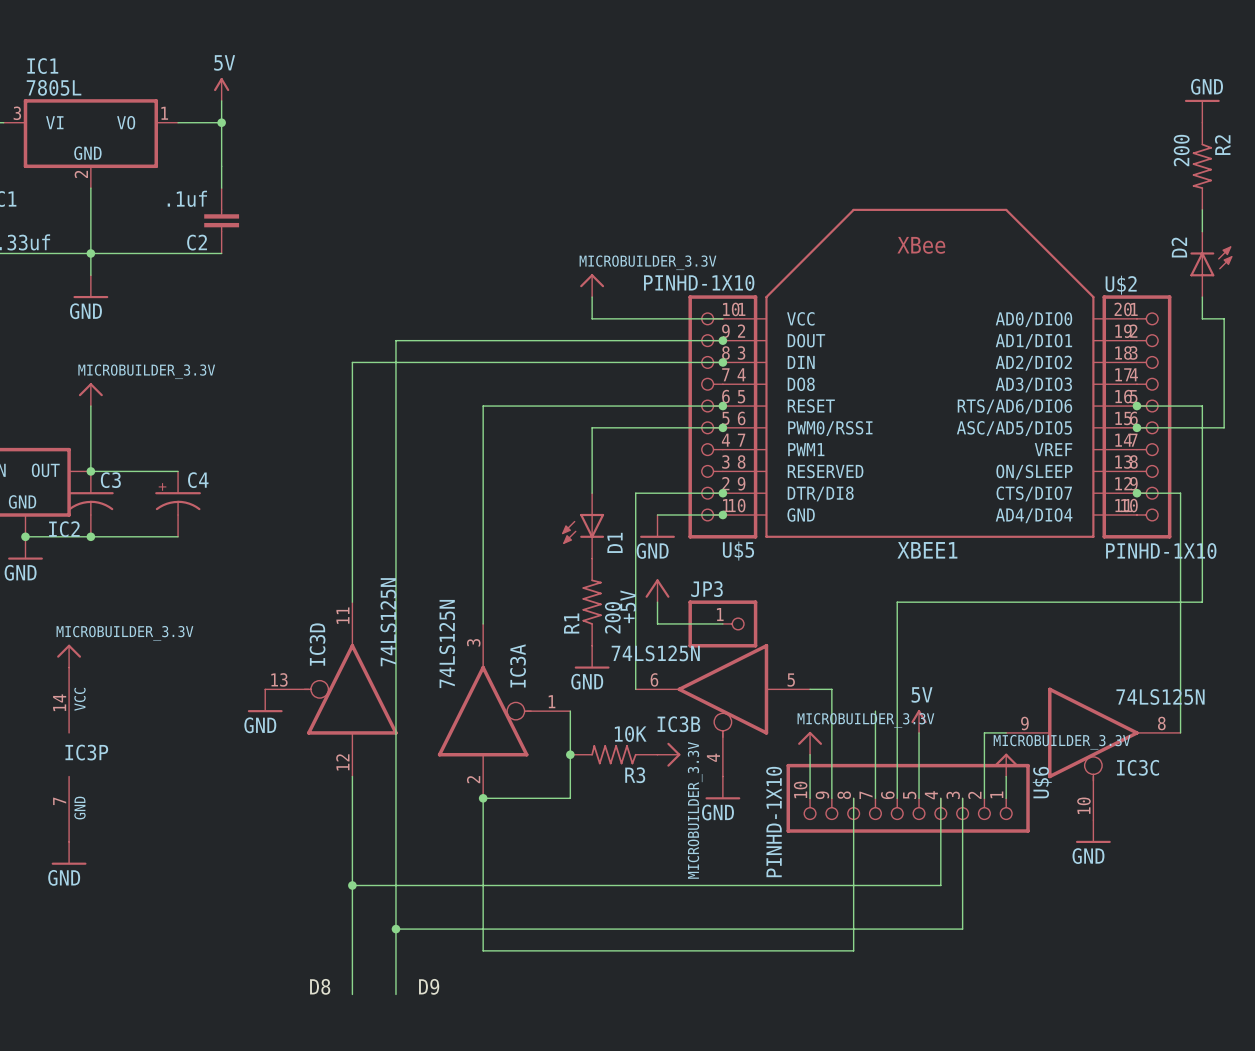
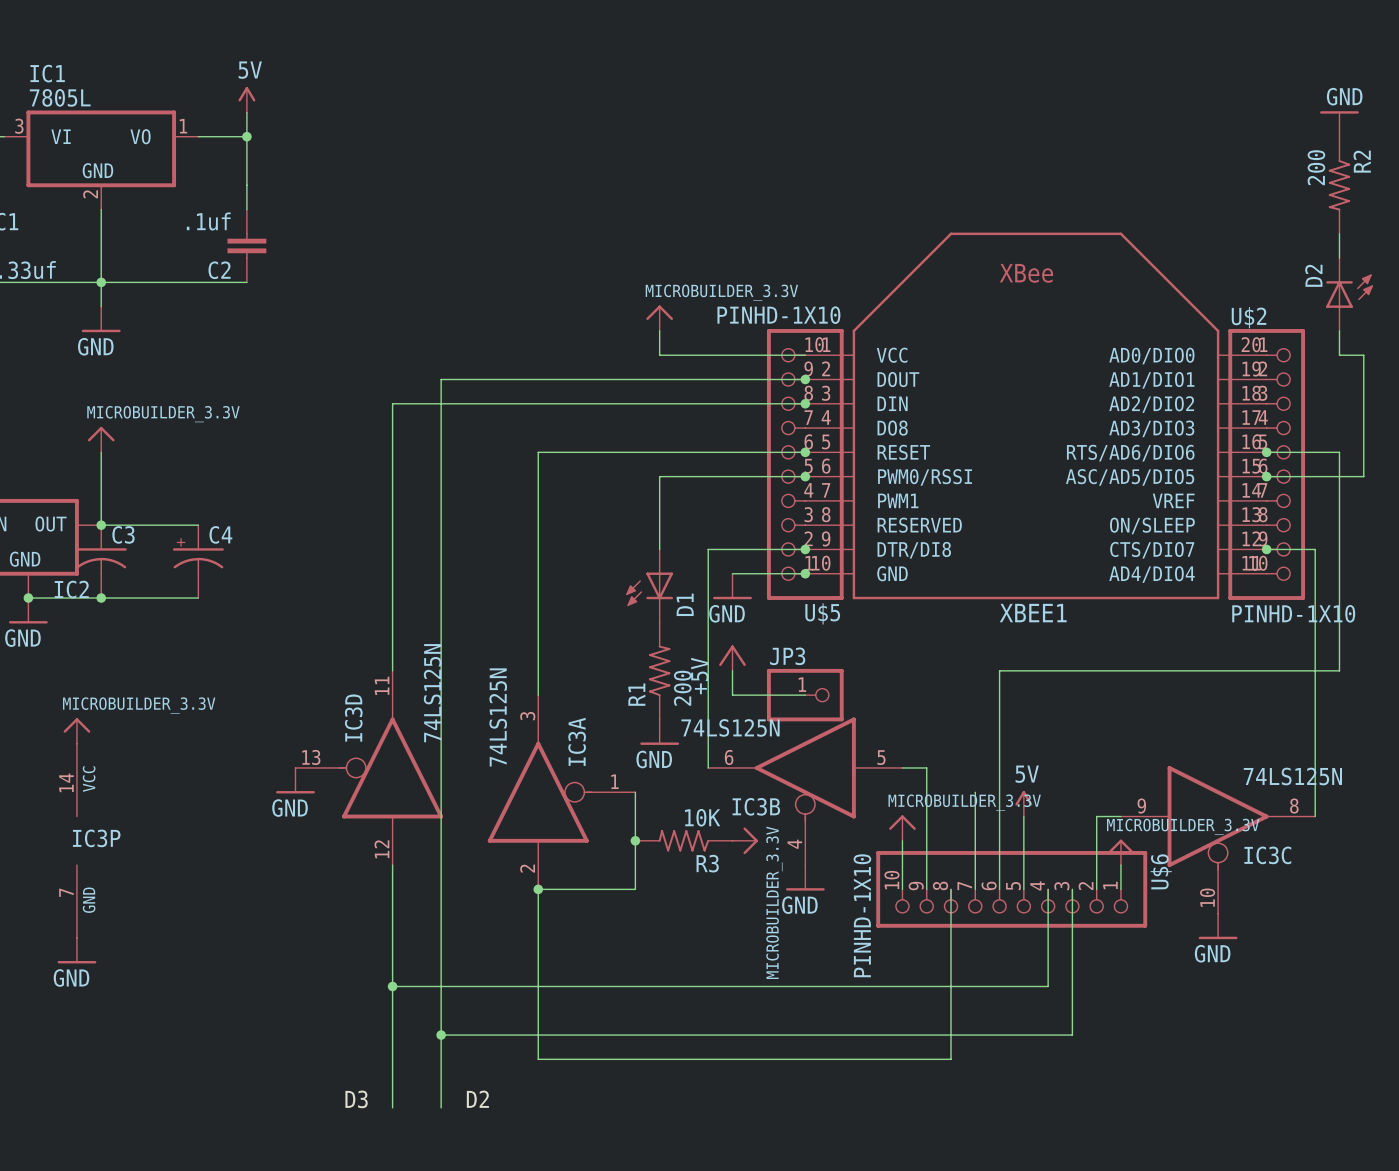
label: D8 (320, 986) -> D3 (356, 1099)
label: D9 (429, 986) -> D2 (477, 1099)

